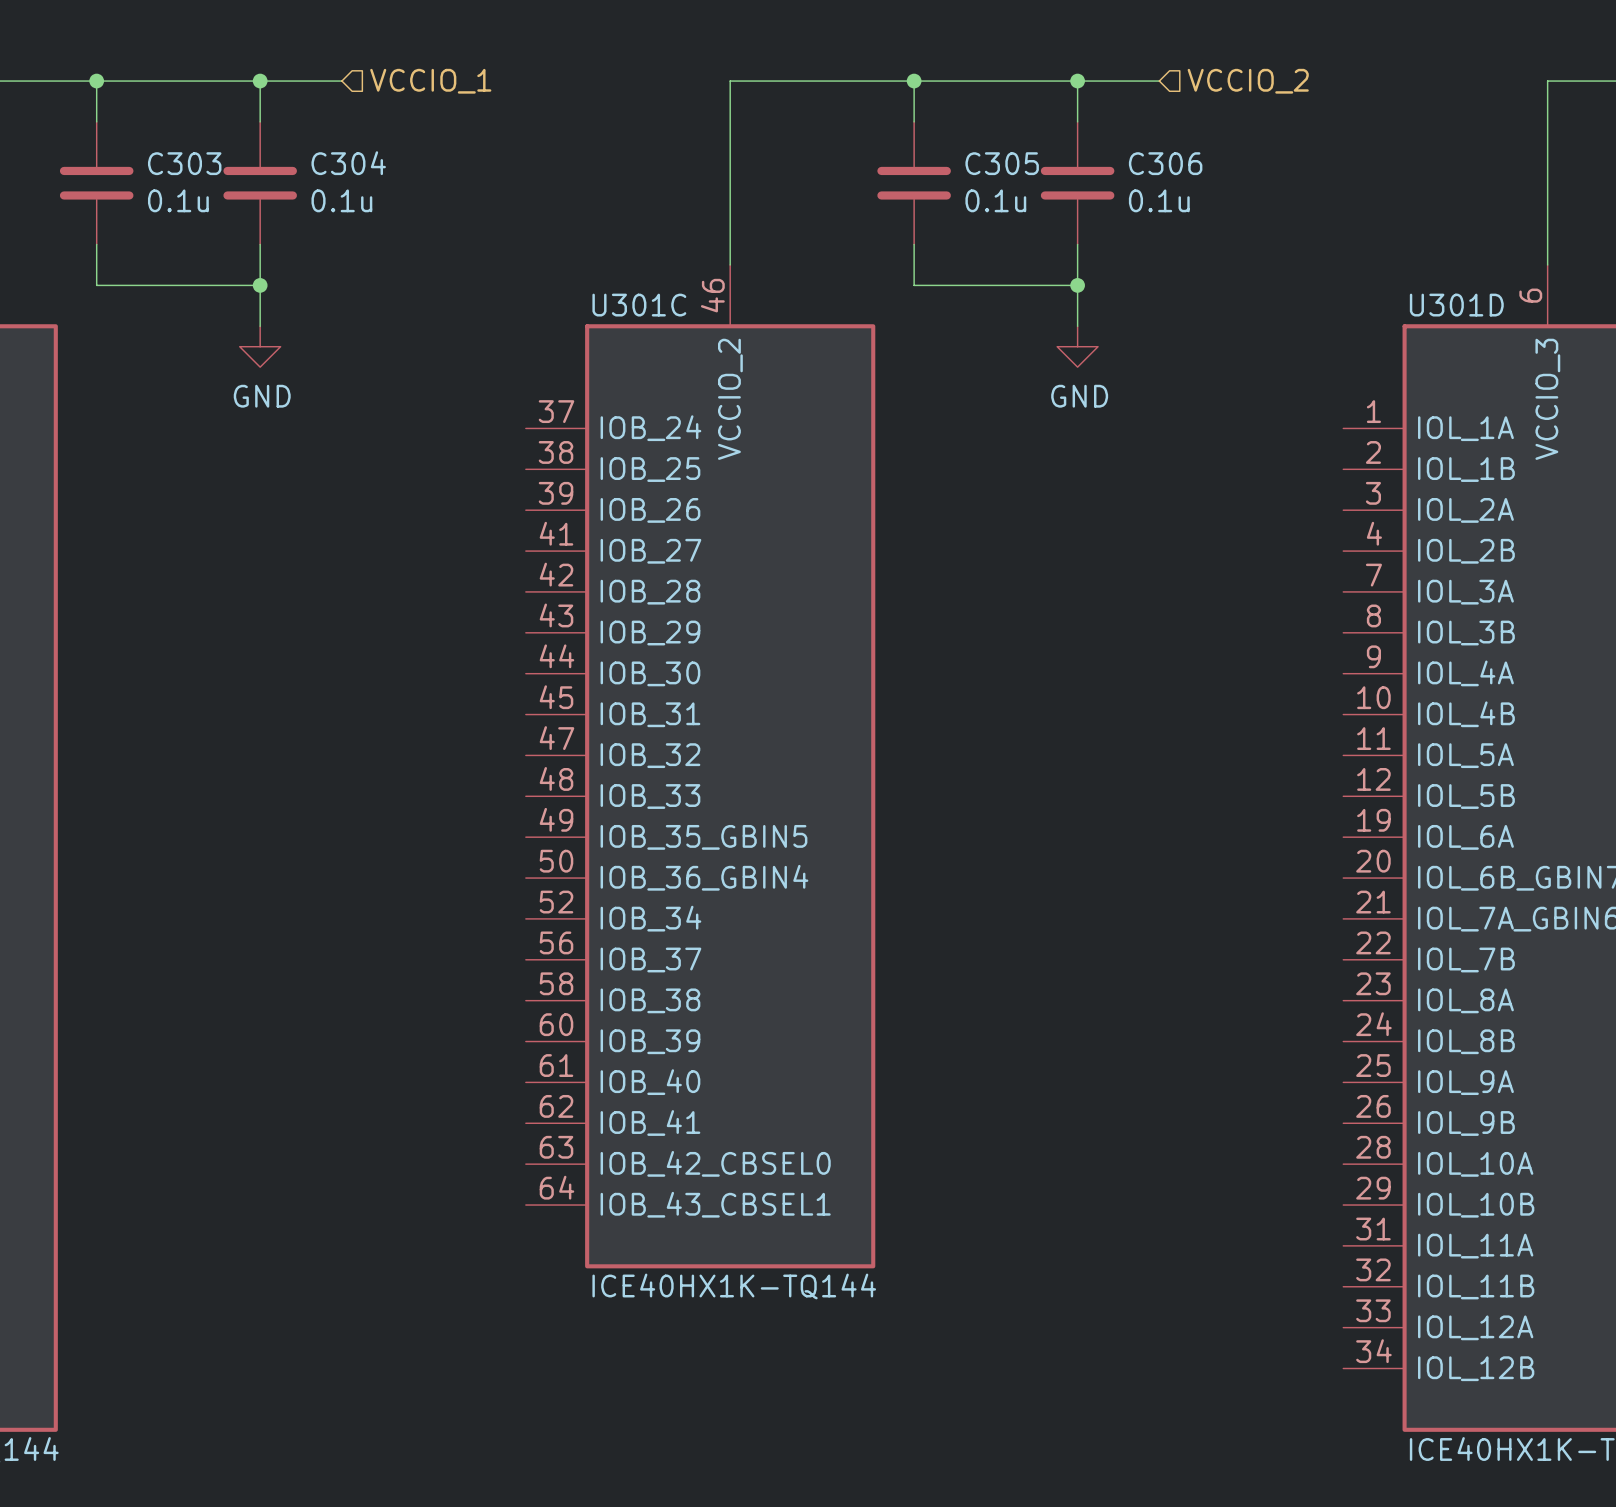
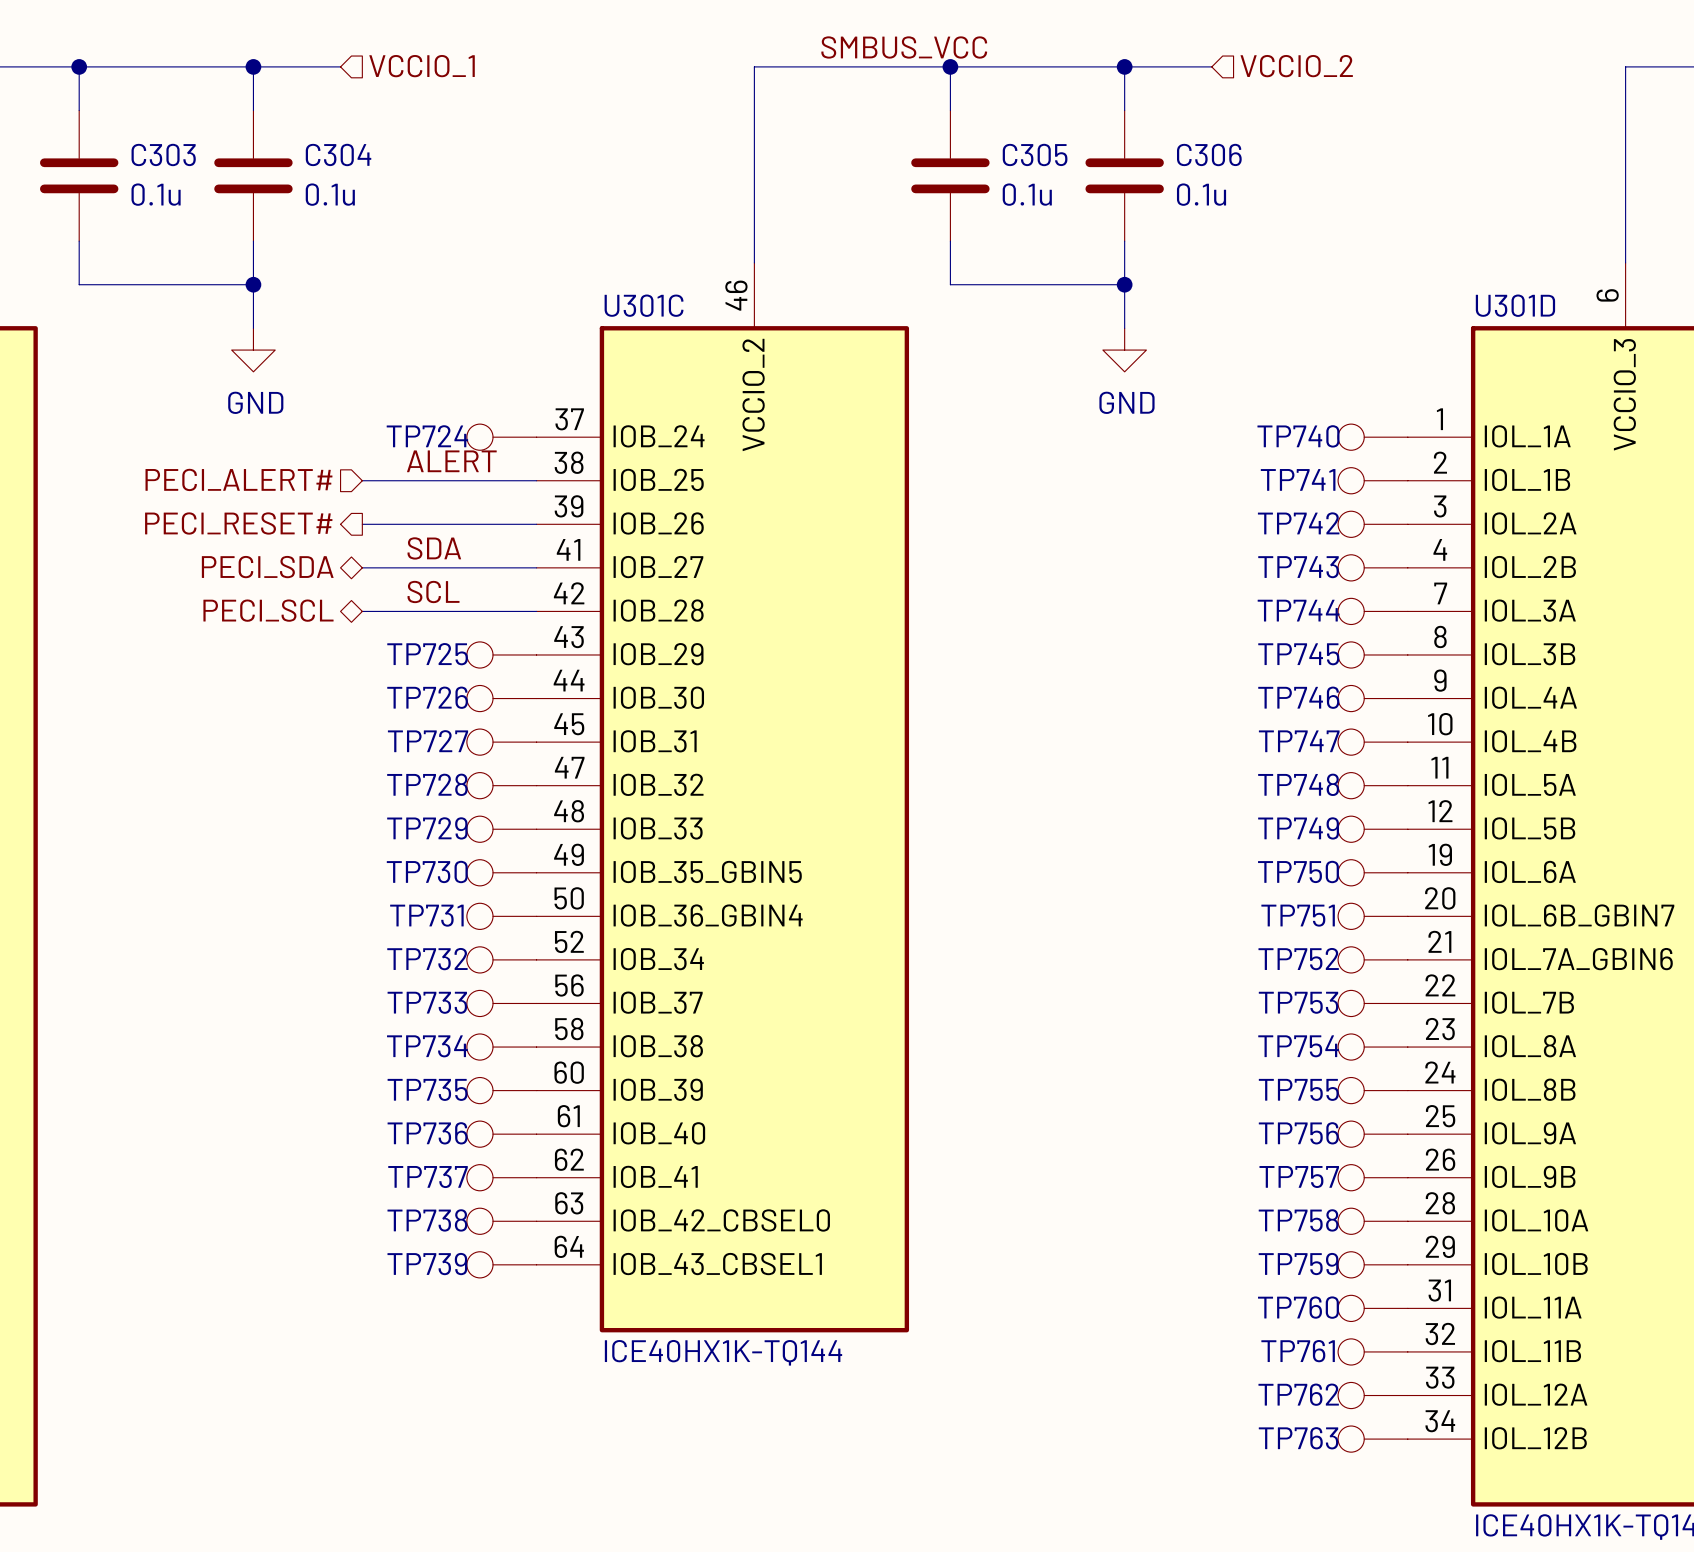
label: none -> SMBUS_VCC (904, 47)
TP724: none -> (501, 437)
TP740: none -> (1372, 437)
label: none -> ALERT (451, 461)
hierarchical label: none -> PECI_ALERT# (238, 479)
wire: none -> (362, 480) (536, 480)
TP741: none -> (1372, 480)
hierarchical label: none -> PECI_RESET# (238, 523)
wire: none -> (362, 524) (536, 524)
TP742: none -> (1372, 524)
label: none -> SDA (434, 548)
hierarchical label: none -> PECI_SDA (267, 567)
wire: none -> (362, 567) (536, 567)
TP743: none -> (1372, 567)
label: none -> SCL (433, 592)
wire: none -> (362, 611) (536, 611)
TP744: none -> (1372, 611)
hierarchical label: none -> PECI_SCL (268, 610)
TP725: none -> (501, 654)
TP745: none -> (1372, 654)
TP726: none -> (501, 698)
TP746: none -> (1372, 698)
TP727: none -> (501, 742)
TP747: none -> (1372, 742)
TP728: none -> (501, 785)
TP748: none -> (1372, 785)
TP729: none -> (501, 829)
TP749: none -> (1372, 829)
TP730: none -> (501, 872)
TP750: none -> (1372, 872)
TP731: none -> (501, 916)
TP751: none -> (1372, 916)
TP732: none -> (501, 959)
TP752: none -> (1372, 959)
TP733: none -> (501, 1003)
TP753: none -> (1372, 1003)
TP734: none -> (501, 1047)
TP754: none -> (1372, 1047)
TP735: none -> (501, 1090)
TP755: none -> (1372, 1090)
TP736: none -> (501, 1134)
TP756: none -> (1372, 1134)
TP737: none -> (501, 1177)
TP757: none -> (1372, 1177)
TP738: none -> (501, 1221)
TP758: none -> (1372, 1221)
TP739: none -> (501, 1264)
TP759: none -> (1372, 1264)
TP760: none -> (1372, 1308)
TP761: none -> (1372, 1351)
TP762: none -> (1372, 1395)
TP763: none -> (1372, 1439)

